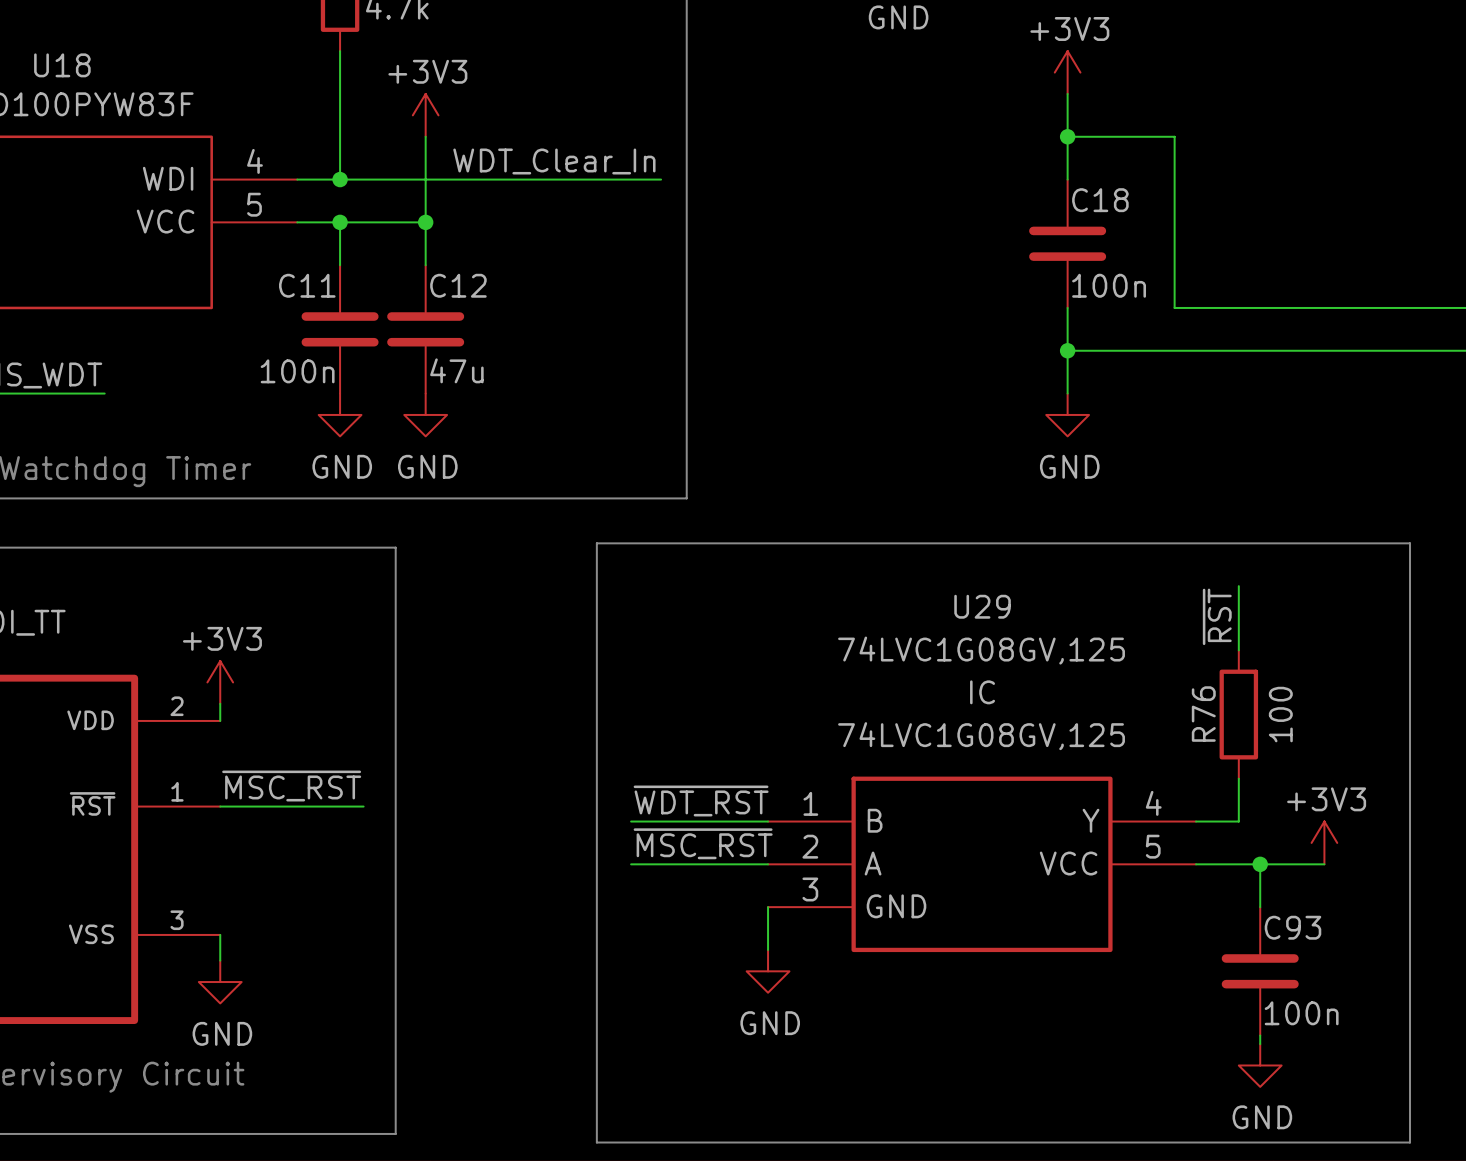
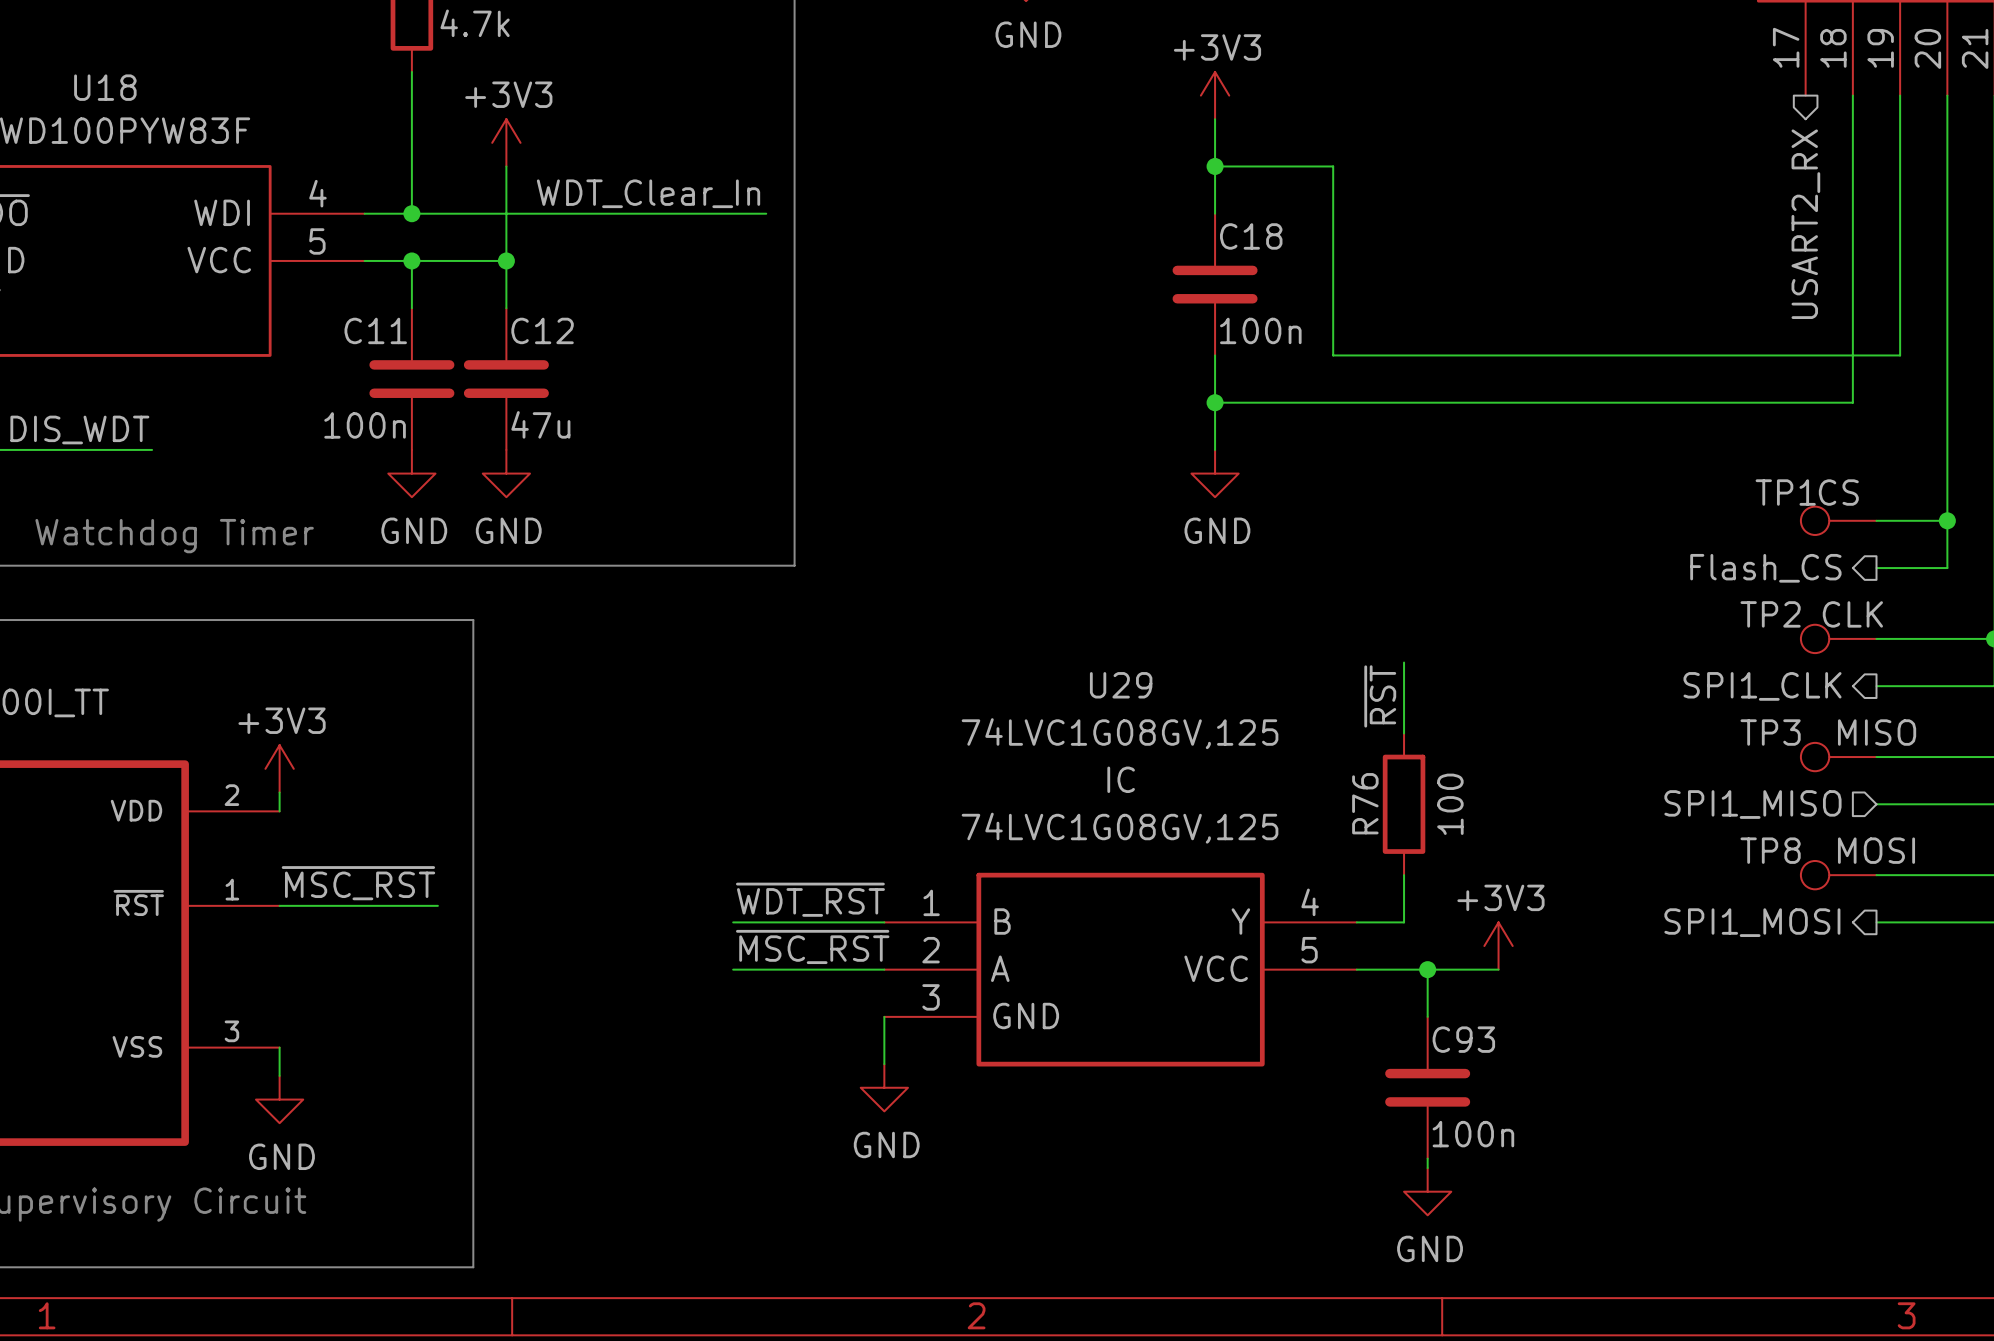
line: (596, 543) (596, 1142) (1410, 1142) (1410, 543) (596, 543) -> none

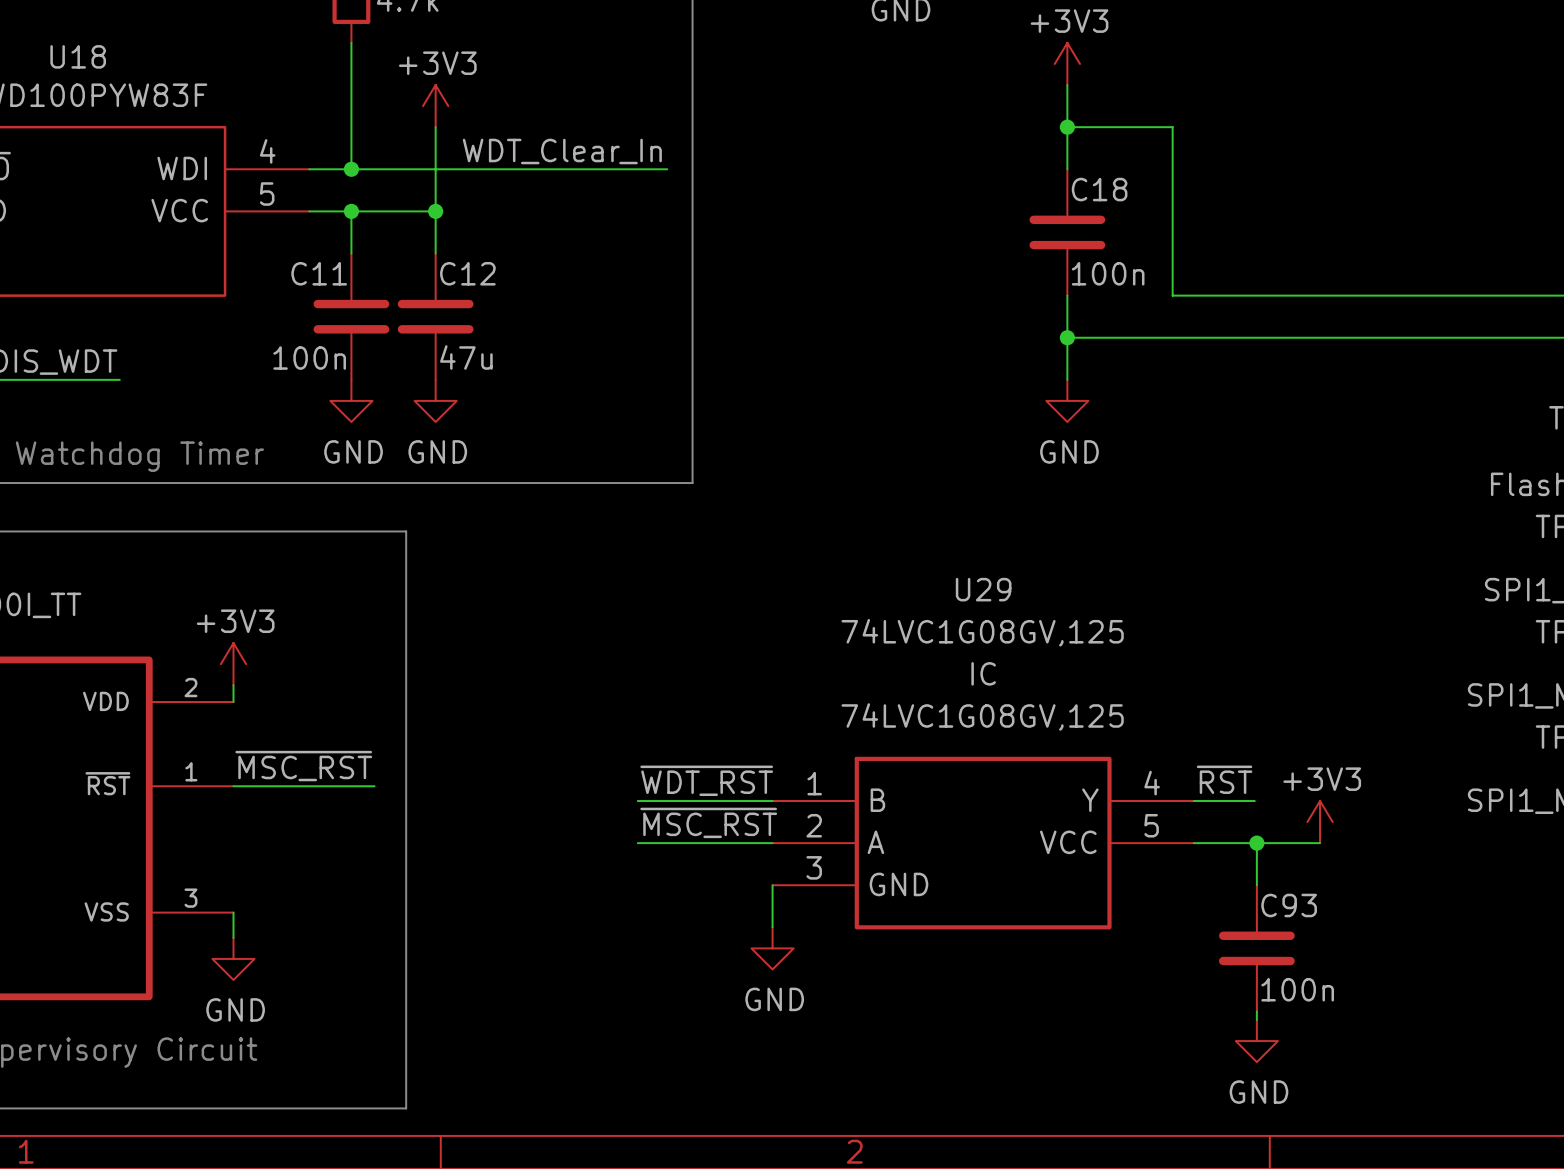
wire: (1404, 662) (1404, 733) -> none
label rotation: 0° (1380, 696) -> 90° clockwise (1224, 779)
label position: ~{RST} (1380, 696) -> ~{RST} (1224, 779)
R76: 100 (1404, 804) -> none
wire: (1404, 875) (1404, 922) -> (1254, 801) (1235, 801)

